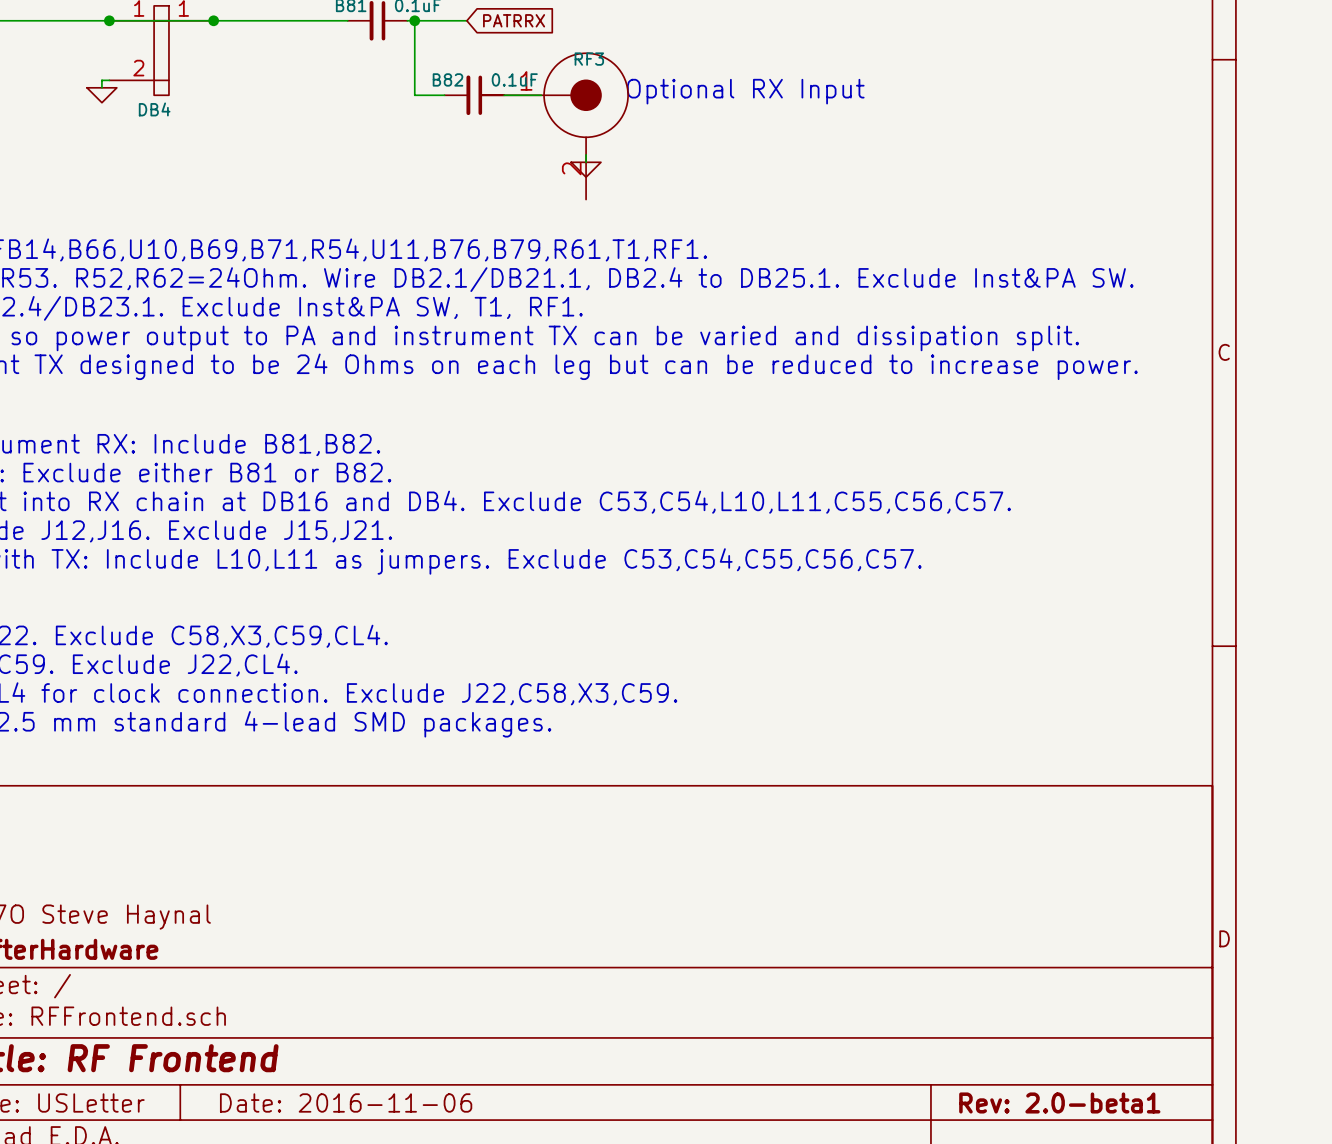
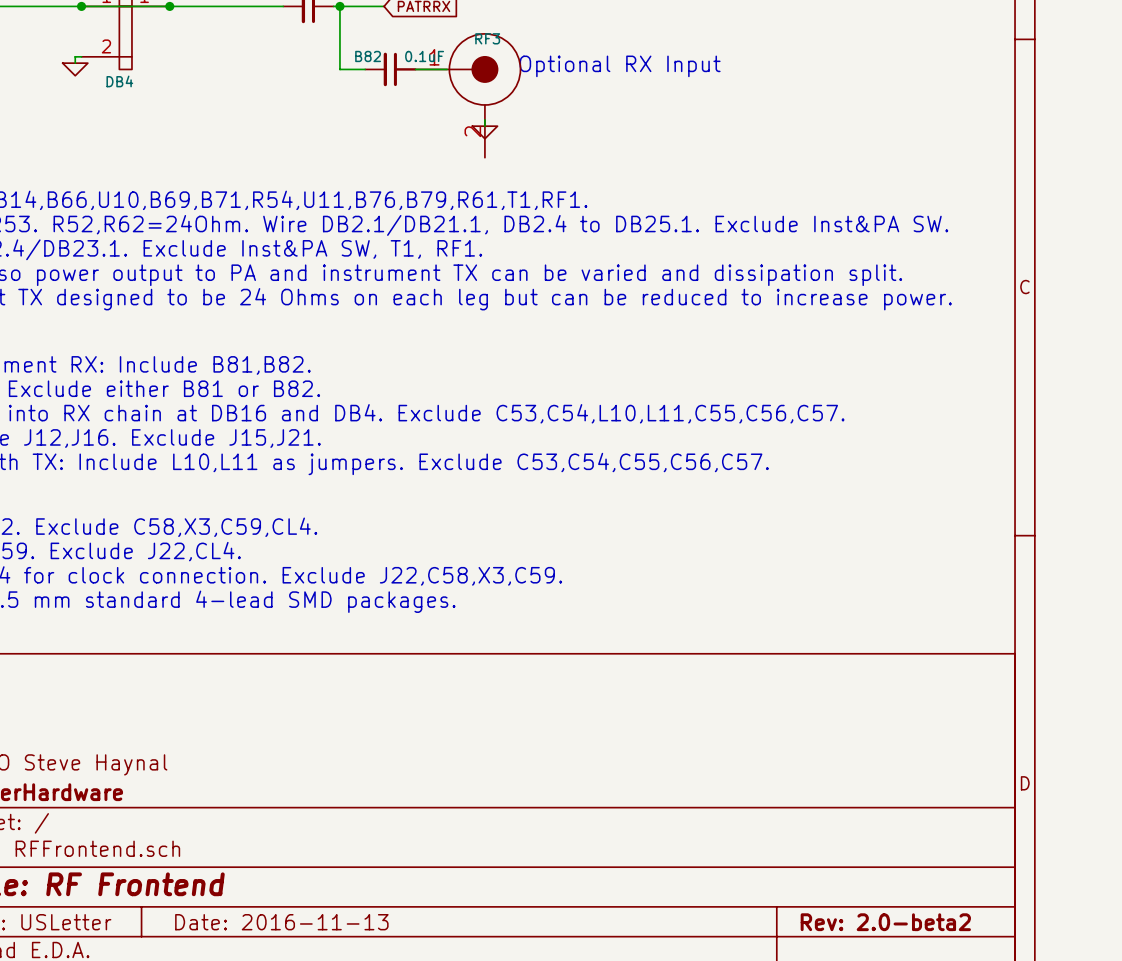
title block: Date: 2016-11-06 (346, 1102) -> Date: 2016-11-13 (281, 922)
title block: Rev: 2.0-beta1 (1059, 1102) -> Rev: 2.0-beta2 (885, 922)

